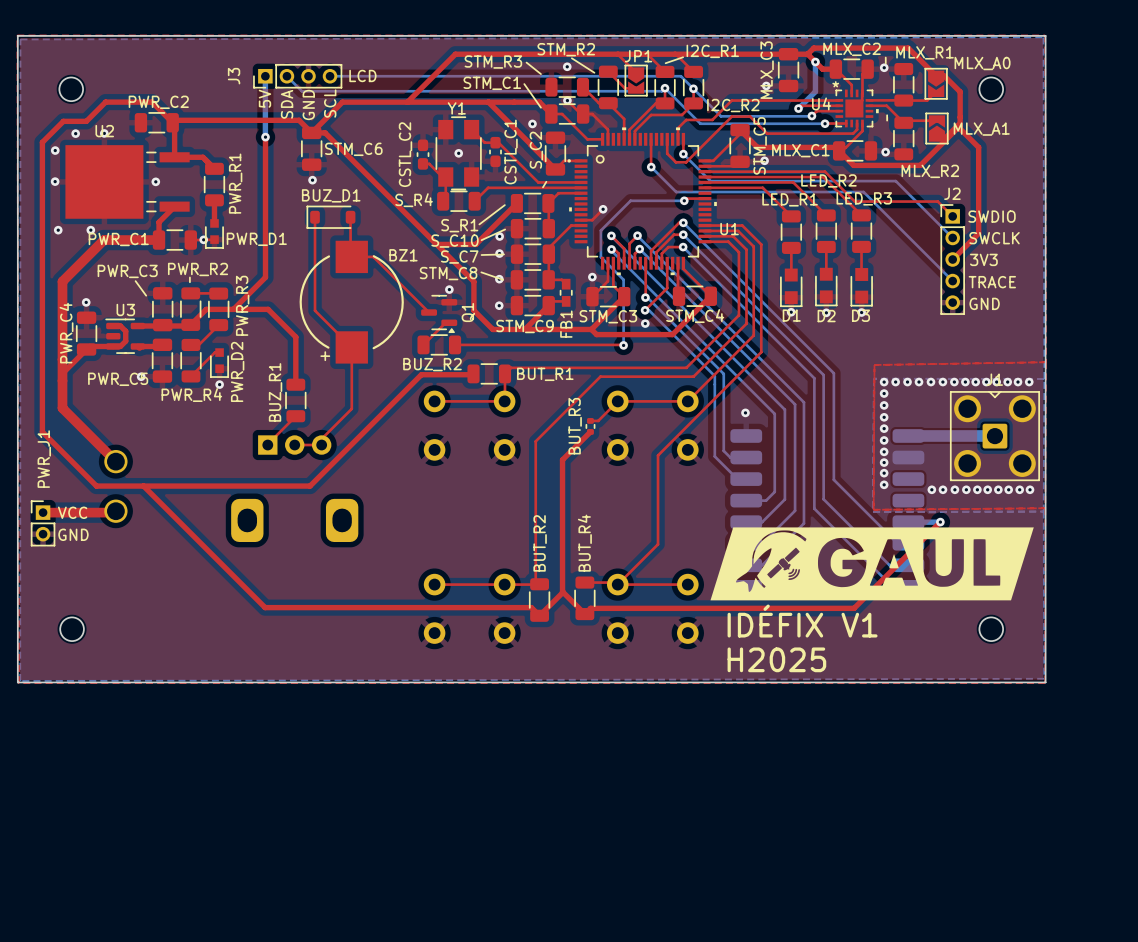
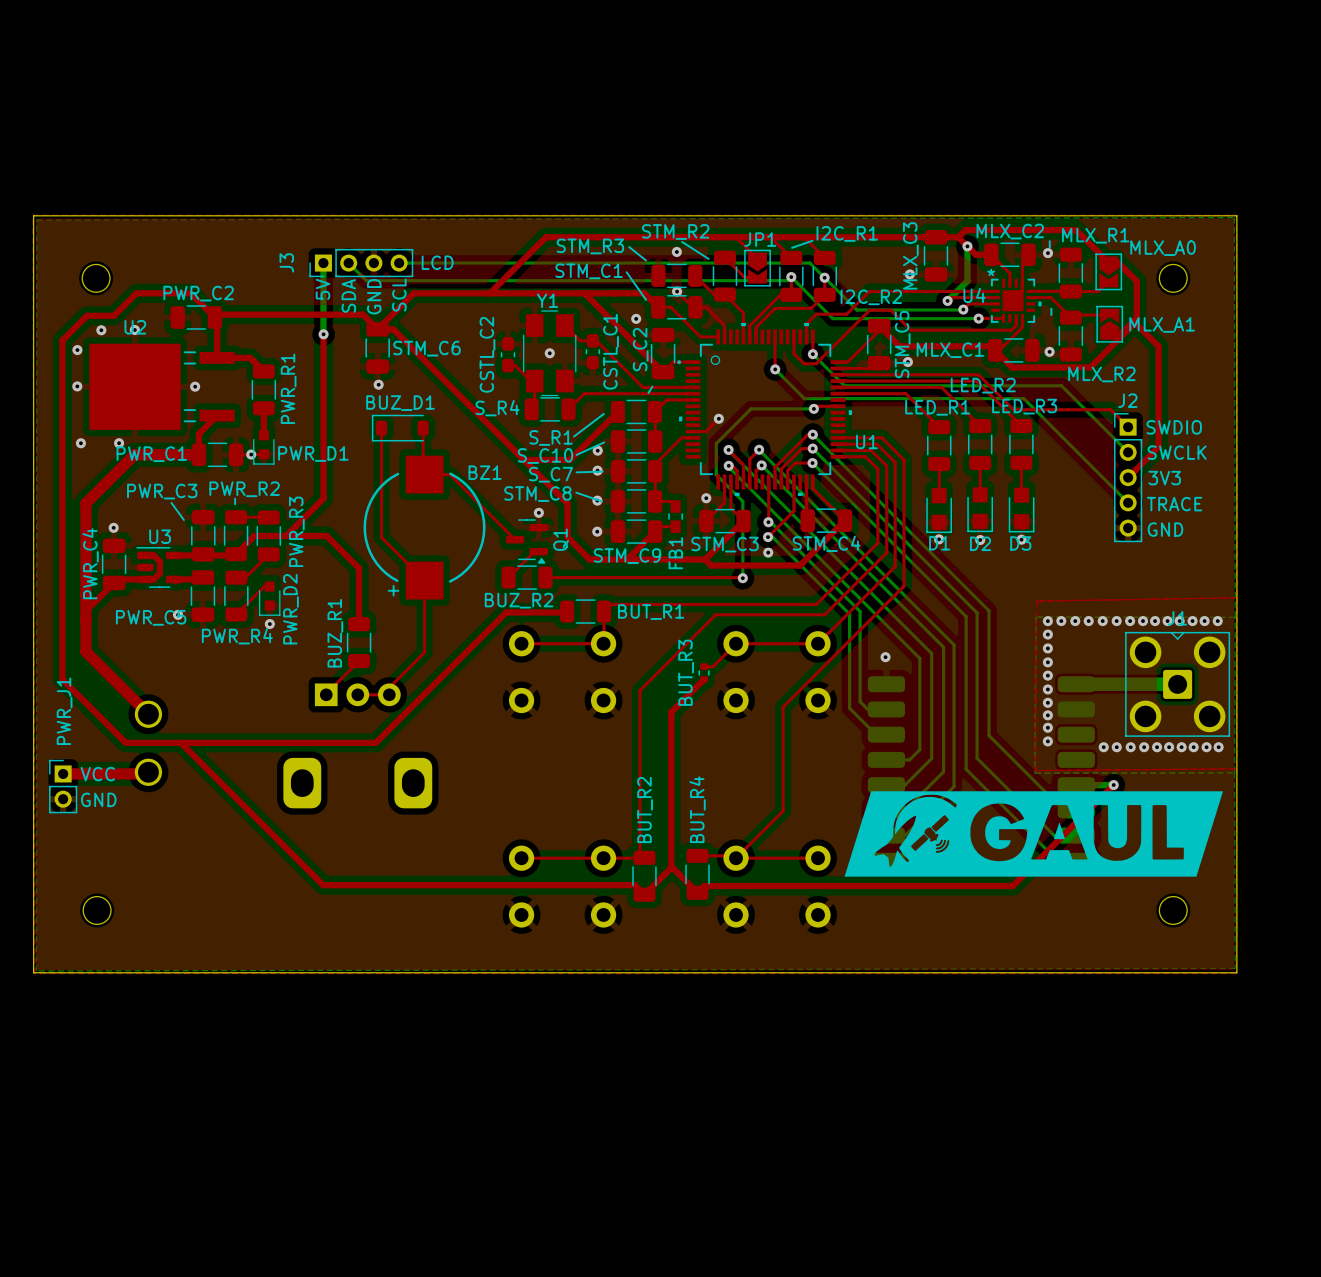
text: IDÉFIX V1 (802, 621) -> none
text: H2025 (776, 659) -> none

